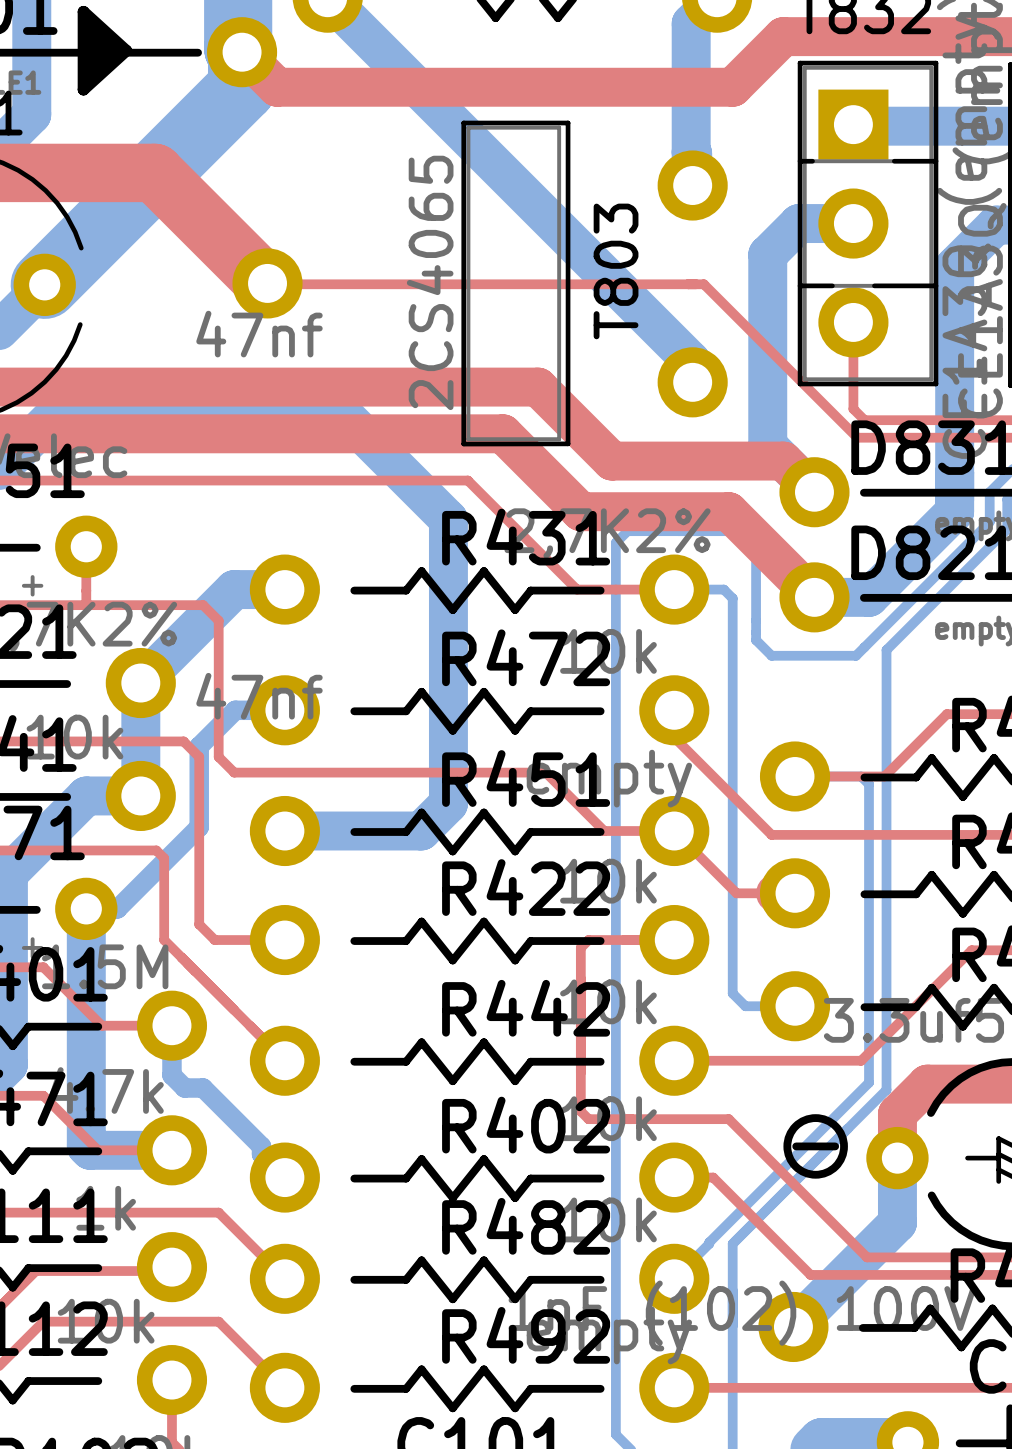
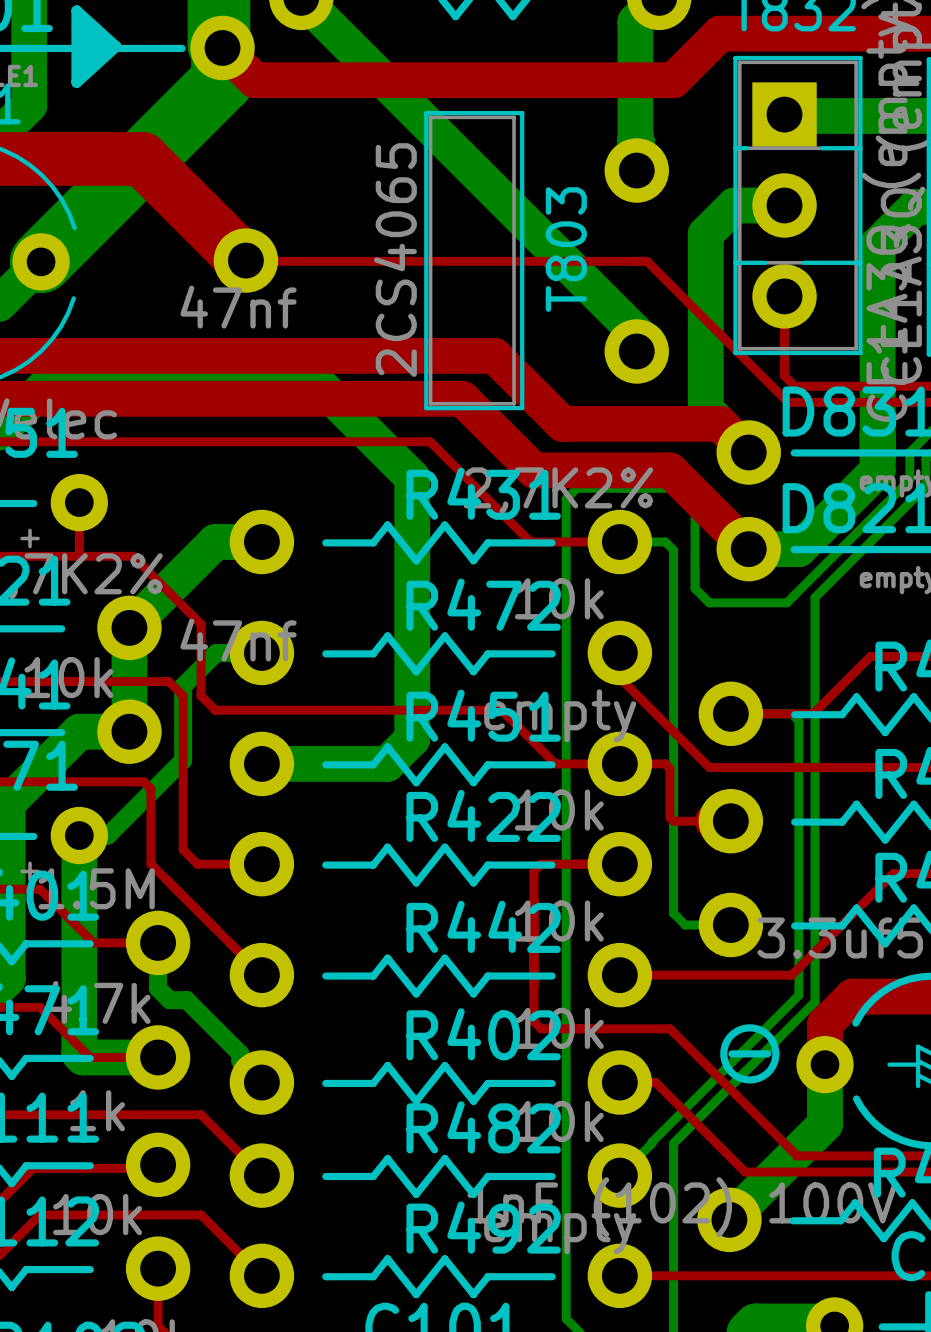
top track: (144, 605) (203, 605) (218, 620) (218, 679) -> (133, 556) (201, 624)
top track: (674, 831) (736, 893) -> (619, 763) (665, 763) (669, 768) (669, 817) (673, 821) (677, 821)

